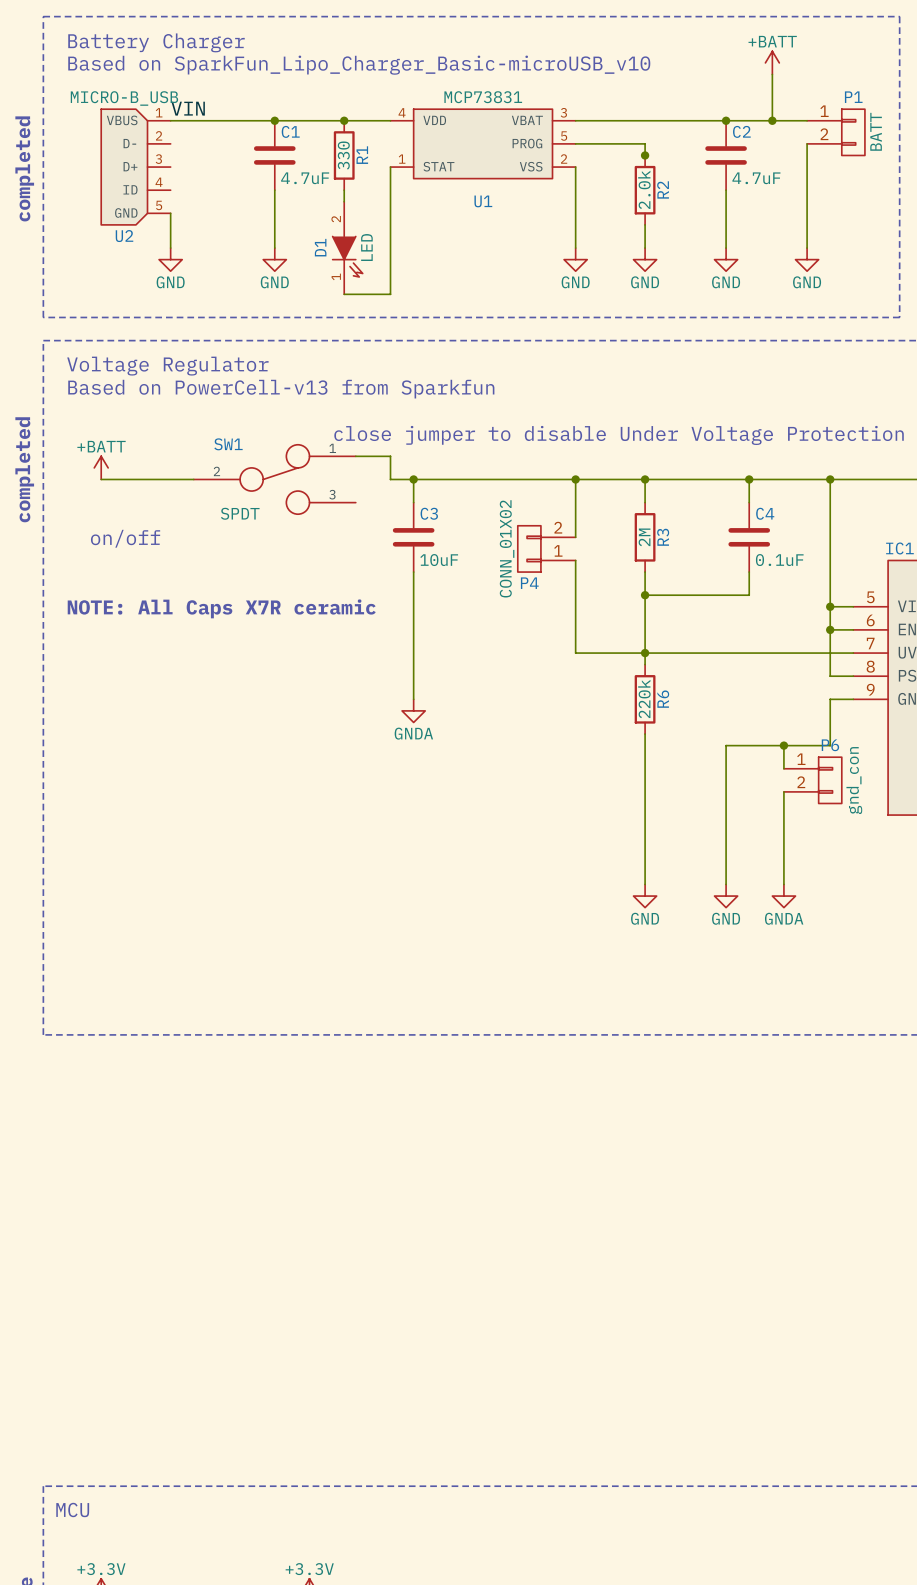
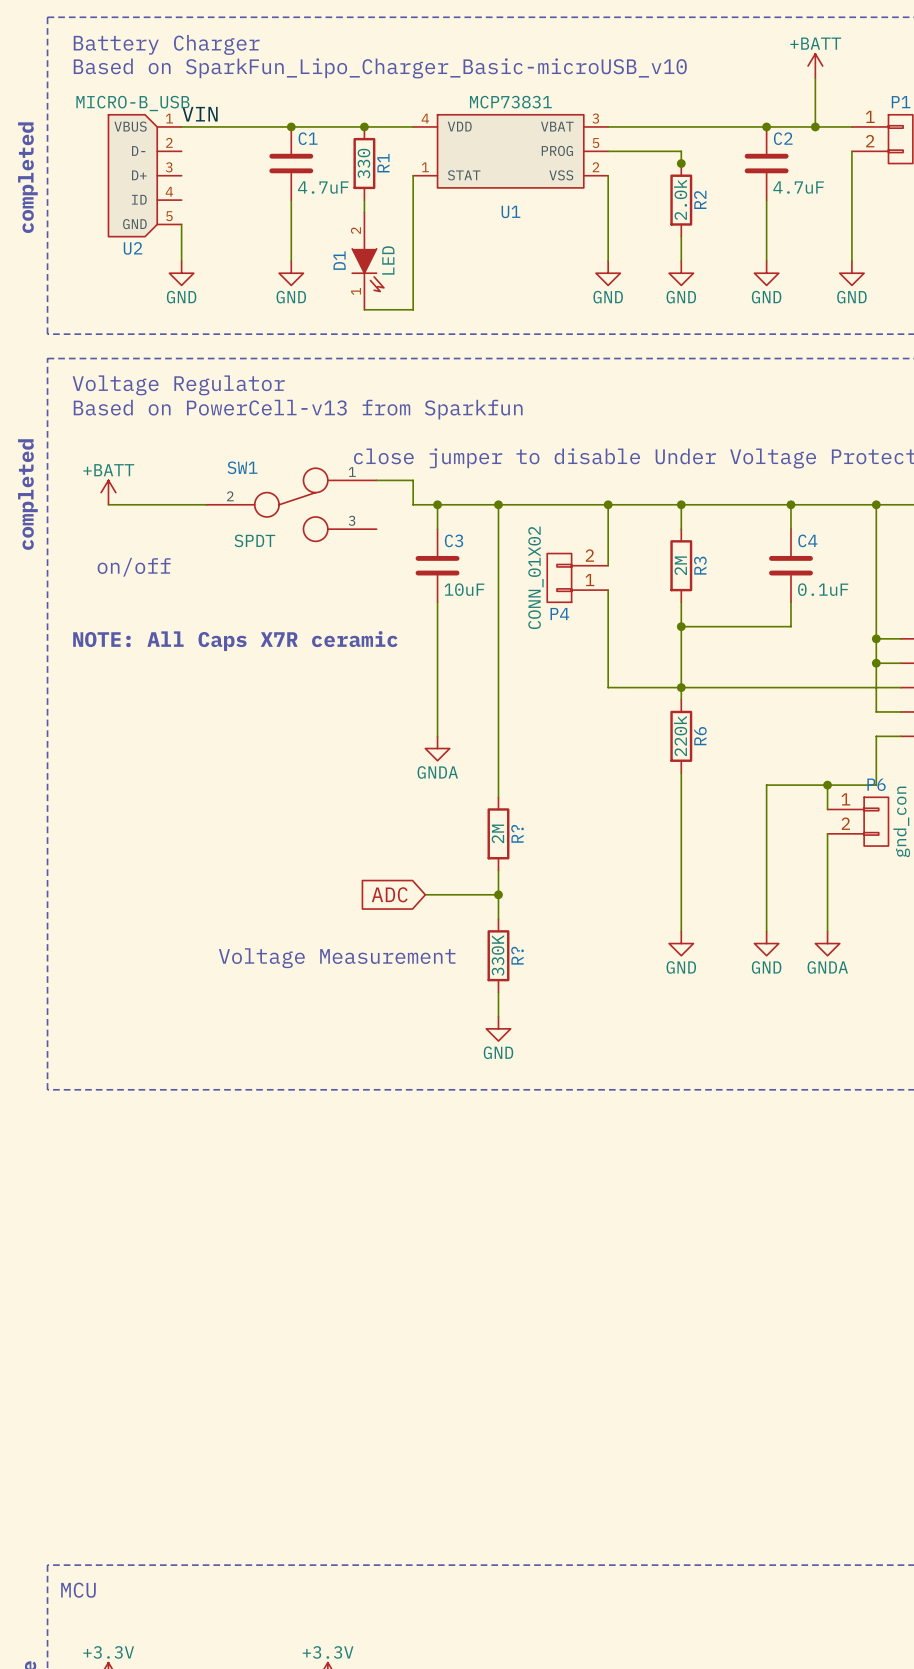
wire: none -> (498, 504) (498, 797)
junction: none -> (498, 504)
R?: none -> 2M (498, 833)
wire: none -> (498, 870) (498, 919)
global label: none -> ADC (389, 894)
wire: none -> (425, 894) (498, 894)
junction: none -> (498, 894)
R?: none -> 330K (498, 955)
text: none -> Voltage Measurement (337, 958)
wire: none -> (498, 992) (498, 1016)
power symbol: none -> GND (498, 1028)

